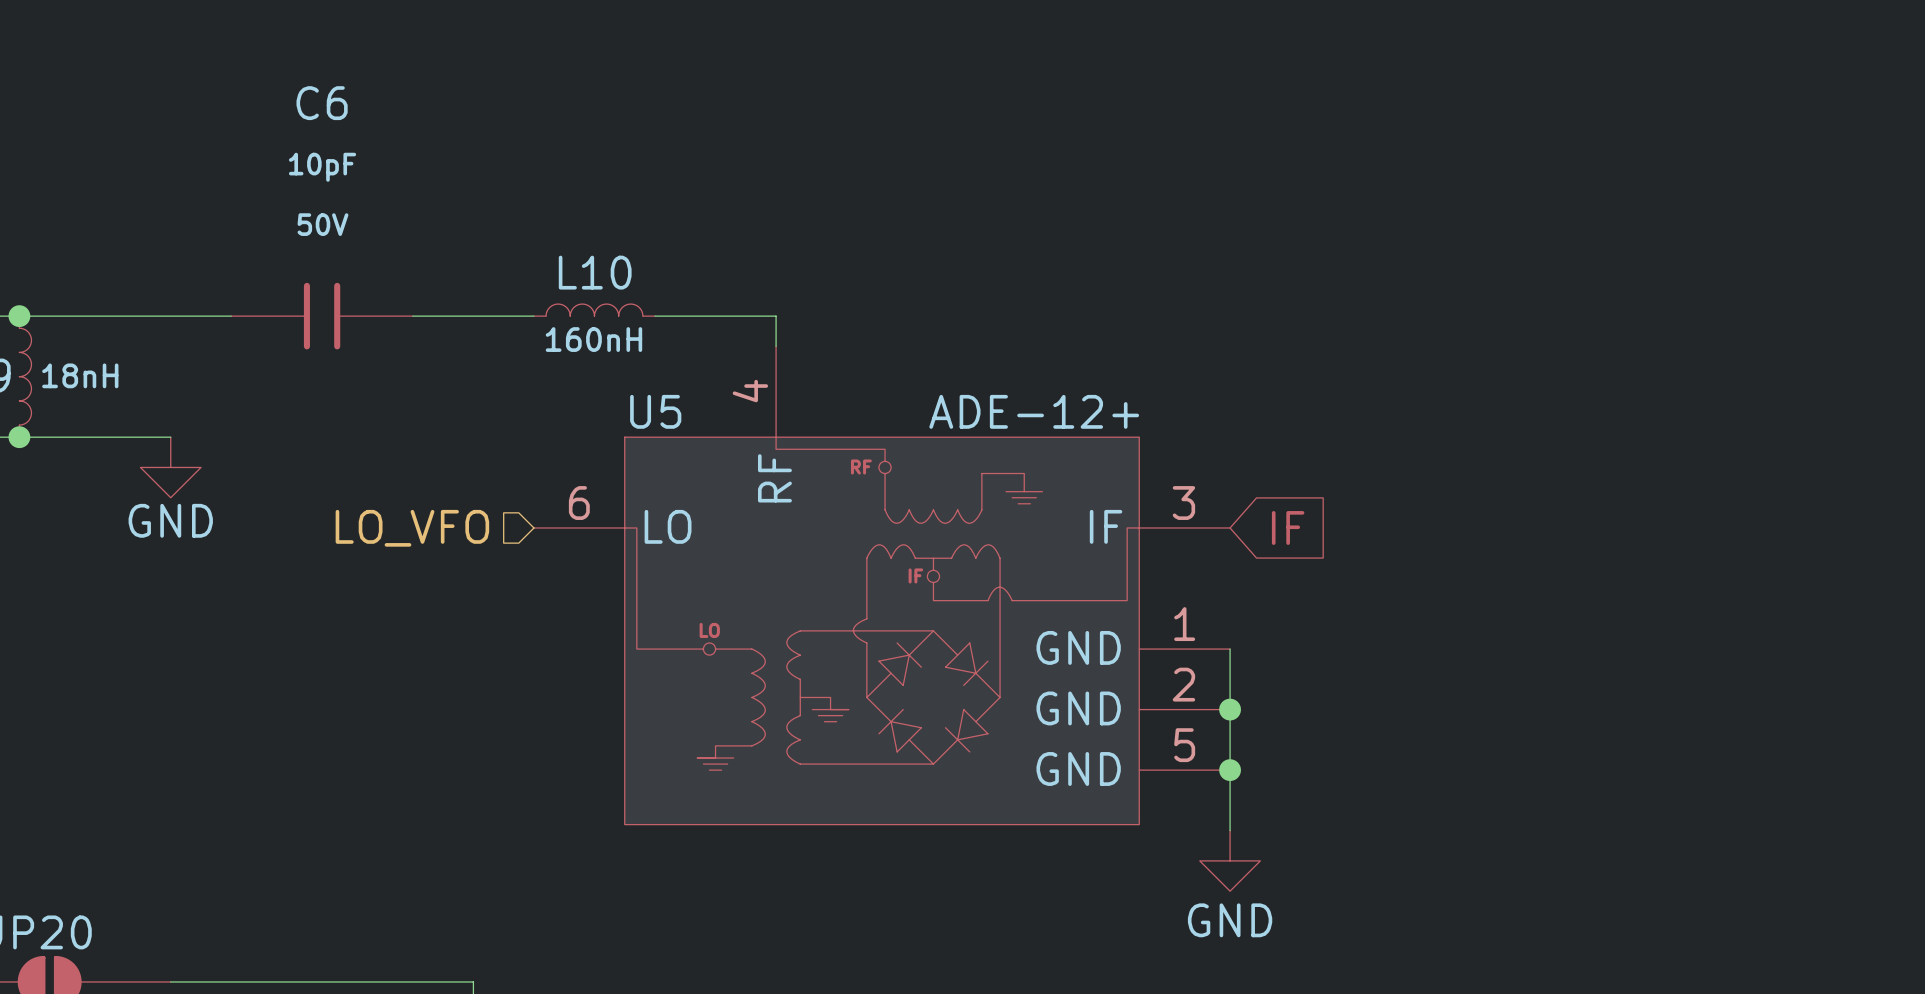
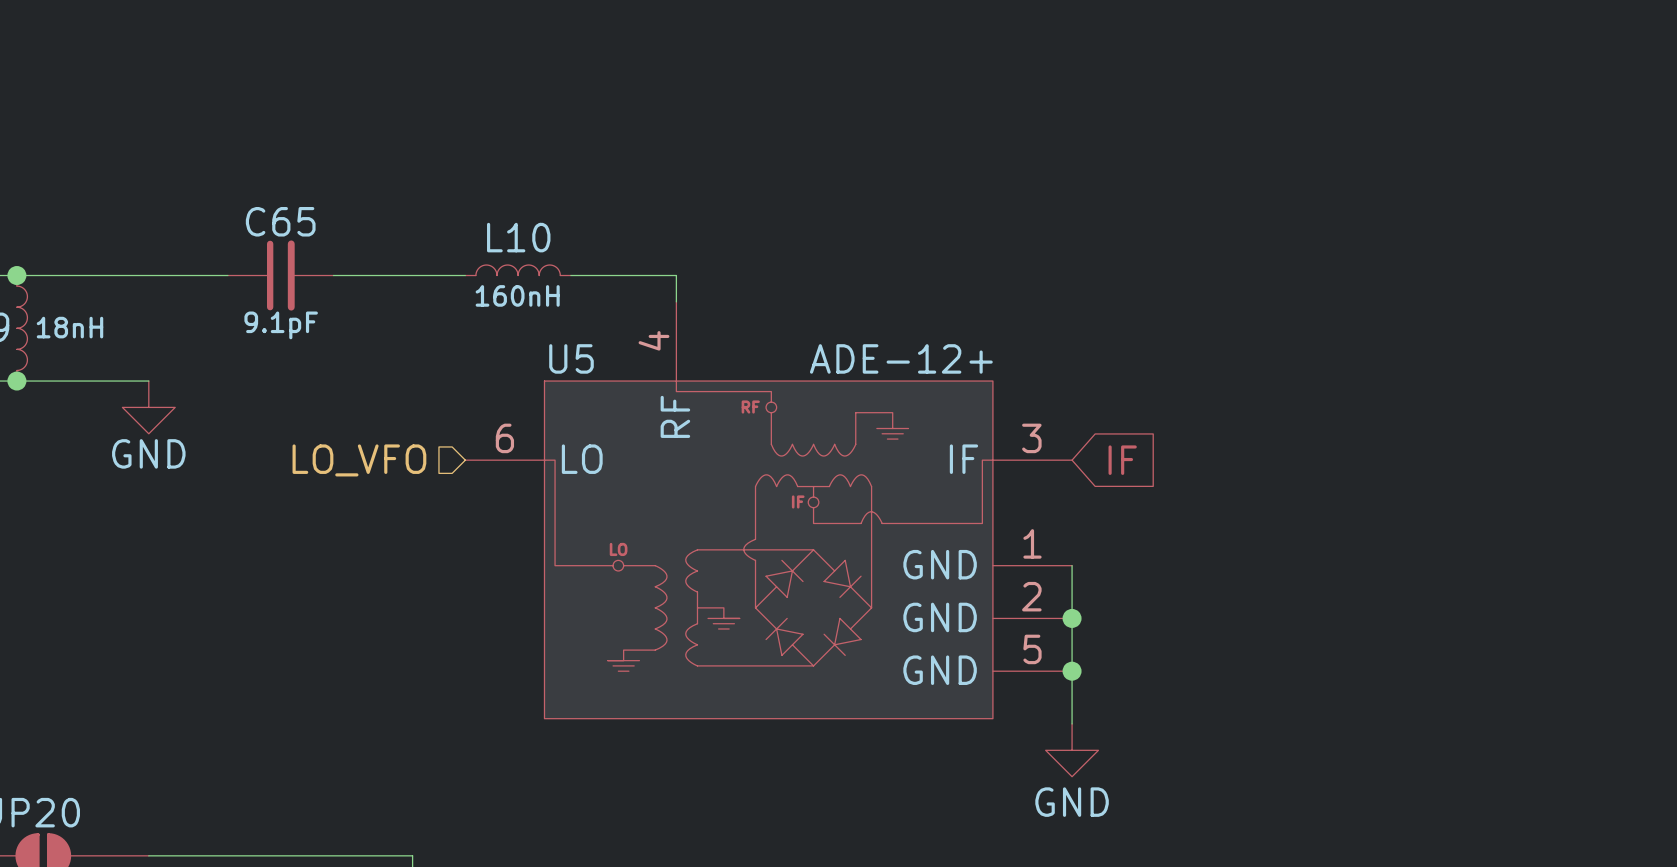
C6: 10pF (322, 316) -> none
C65: none -> 9.1pF (280, 275)

